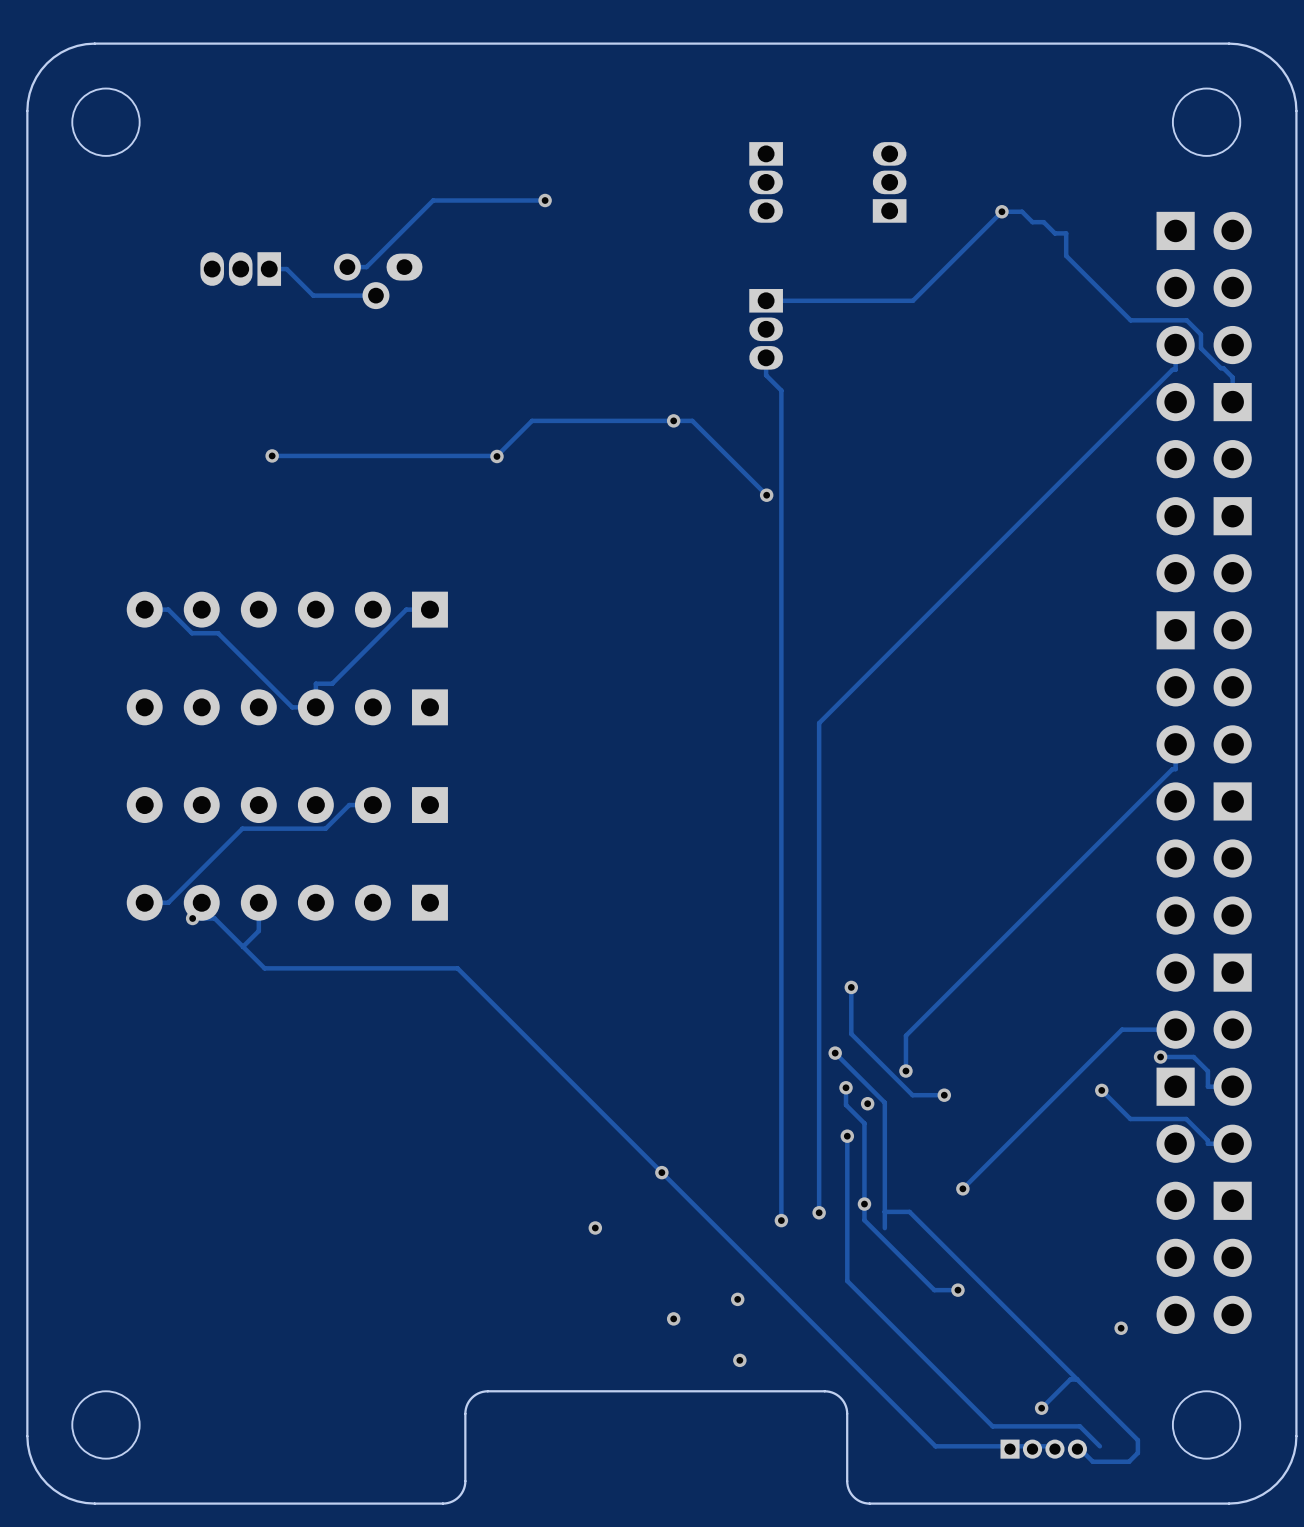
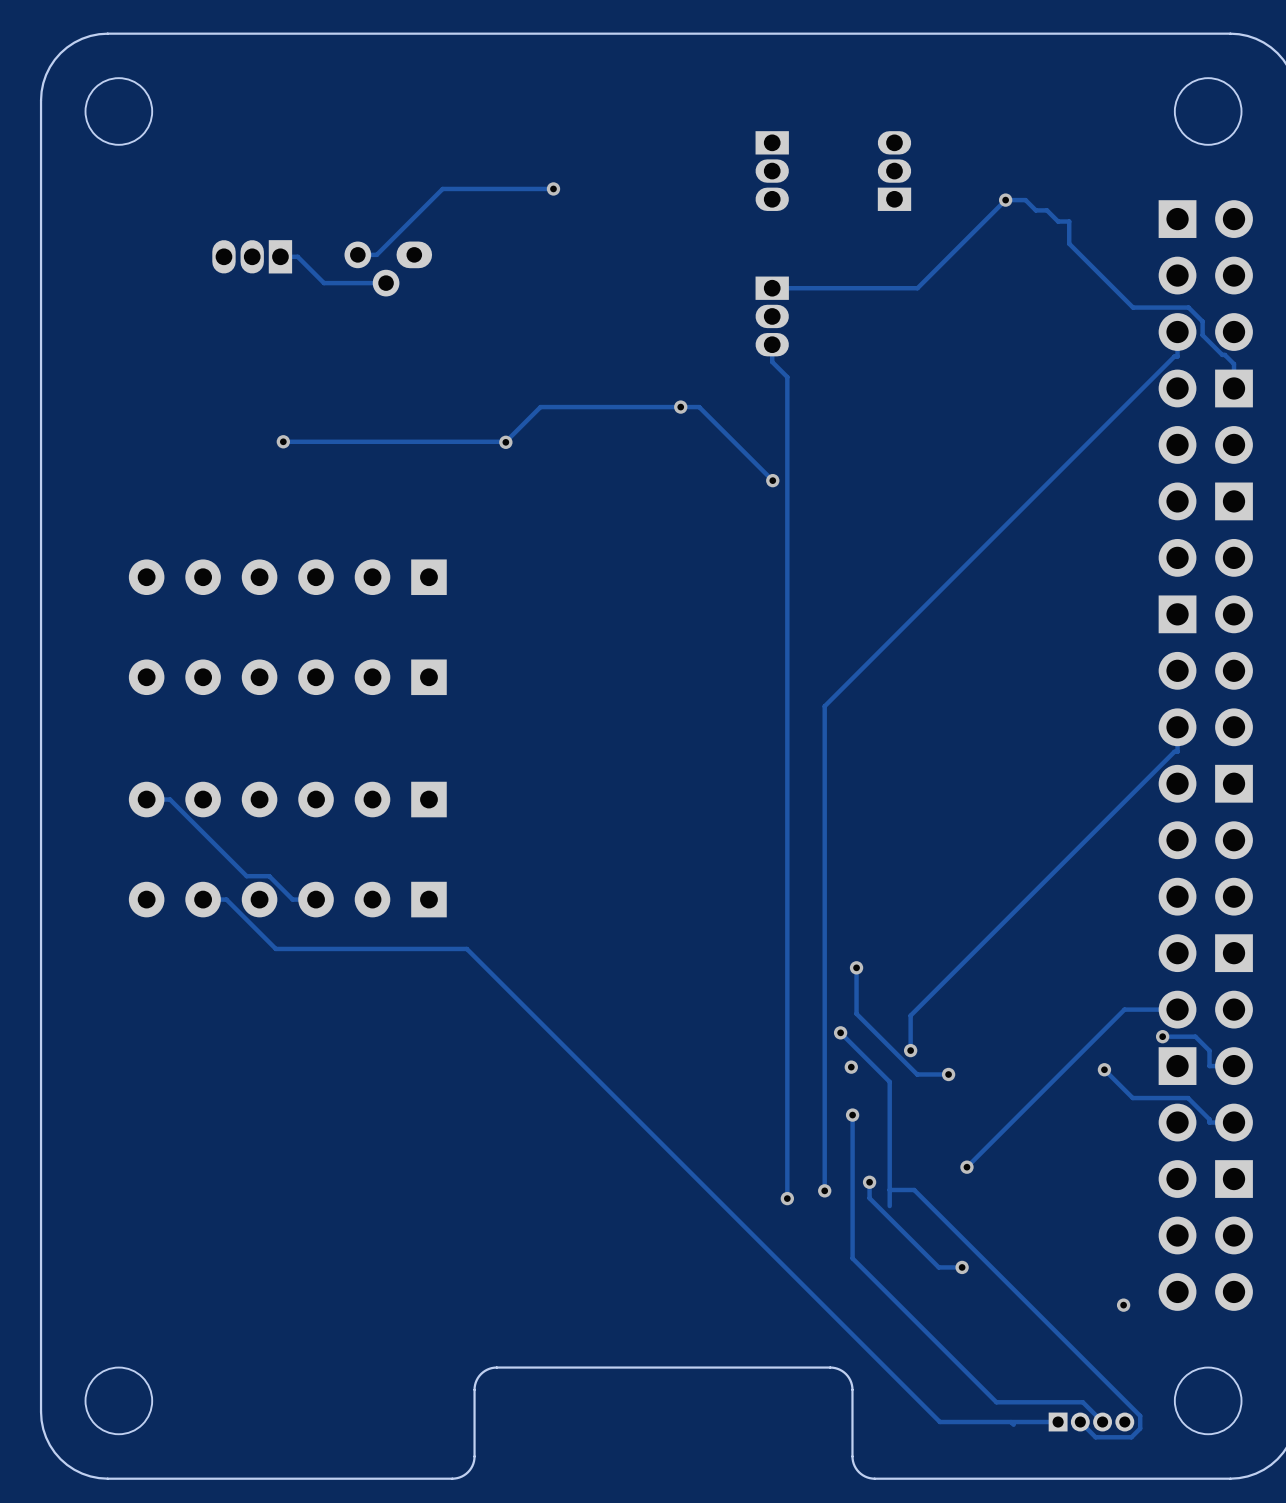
part position: (287, 609) -> (287, 577)
track: (429, 609) (406, 609) (332, 683) (315, 683) (315, 707) (292, 707) (218, 633) (191, 633) (168, 609) (144, 609) -> none
part position: (287, 707) -> (287, 677)
part position: (287, 805) -> (287, 799)
track: (372, 805) (349, 805) (325, 828) (242, 828) (168, 902) (144, 902) -> none
track: none -> (146, 799) (170, 799) (246, 876) (269, 876) (292, 899) (316, 899)
track: (258, 902) (258, 930) (243, 946) -> none
part position: (287, 902) -> (287, 899)
via: (192, 918) -> none
track: (846, 1087) (846, 1104) (864, 1123) (864, 1204) -> none
via: (867, 1103) -> none
via: (661, 1172) -> none
via: (595, 1227) -> none
via: (737, 1299) -> none
via: (673, 1318) -> none
via: (739, 1360) -> none
track: (1077, 1379) (1070, 1379) (1041, 1408) -> none
via: (1041, 1408) -> none
part position: (1043, 1449) -> (1091, 1422)

